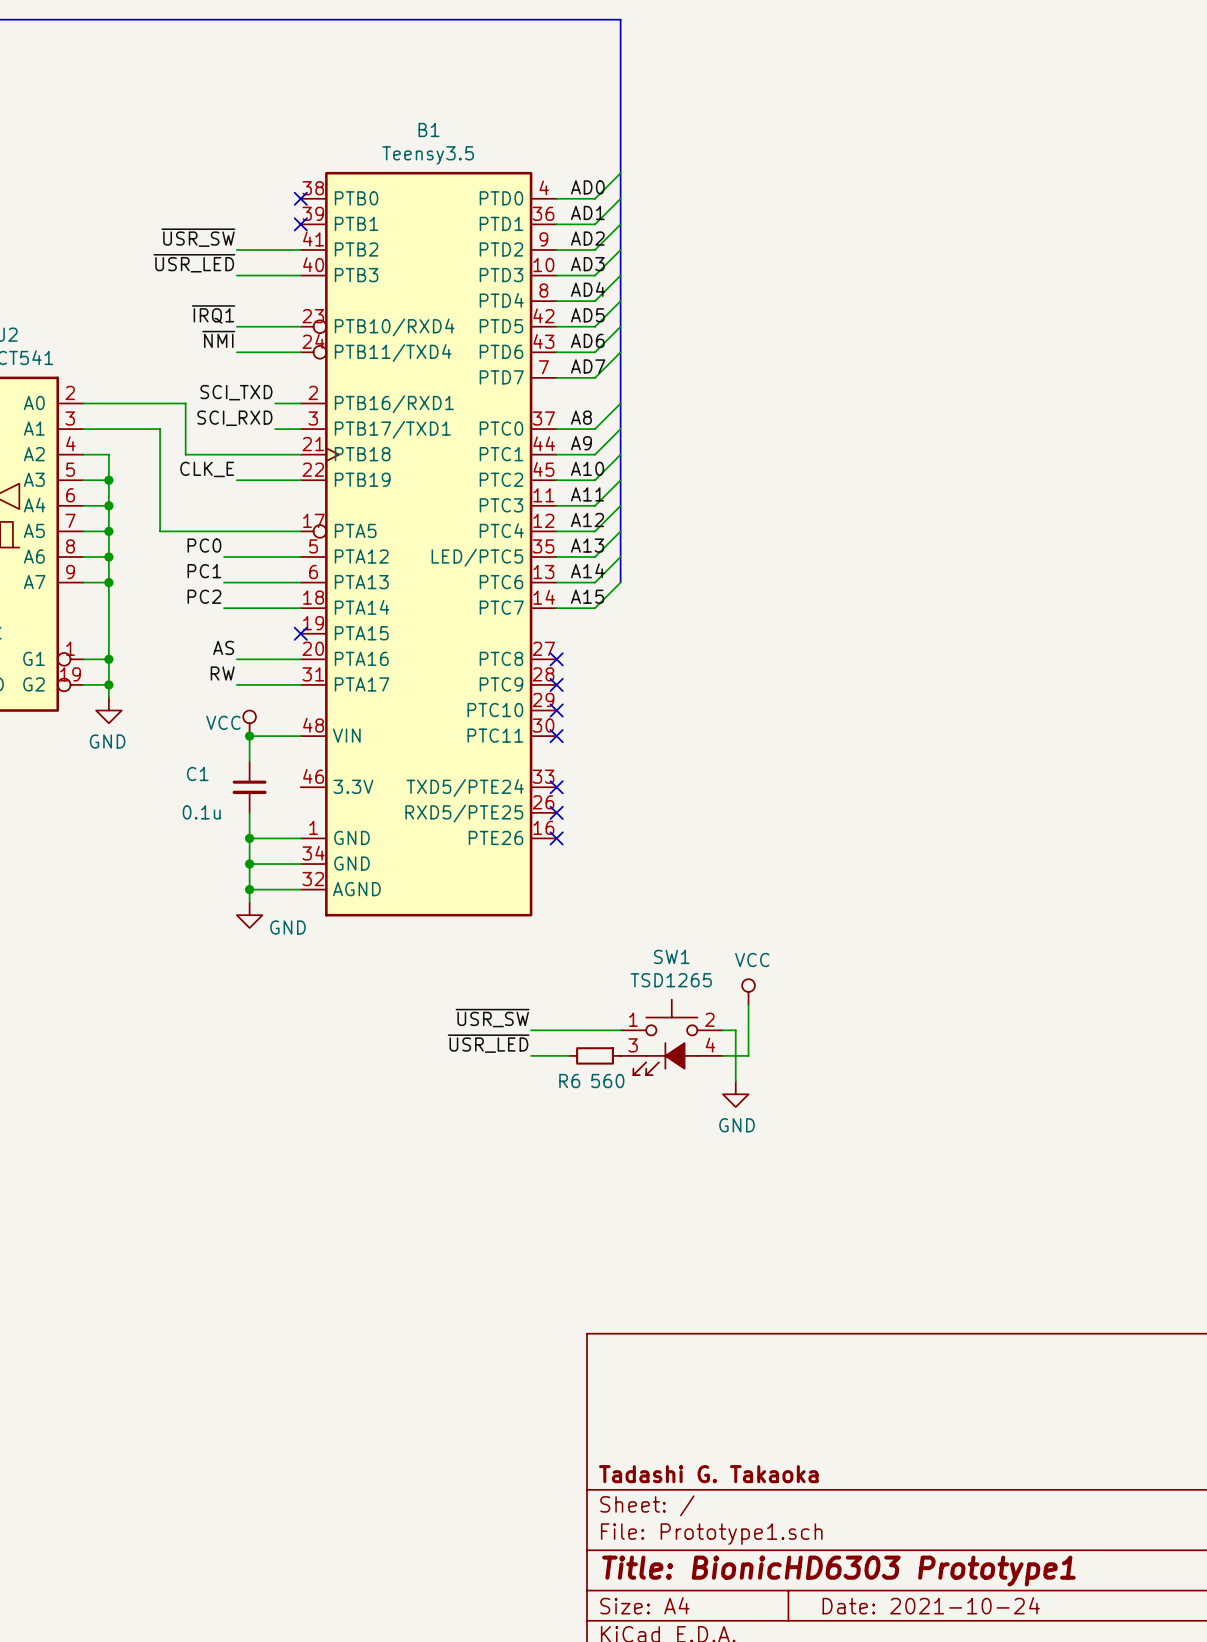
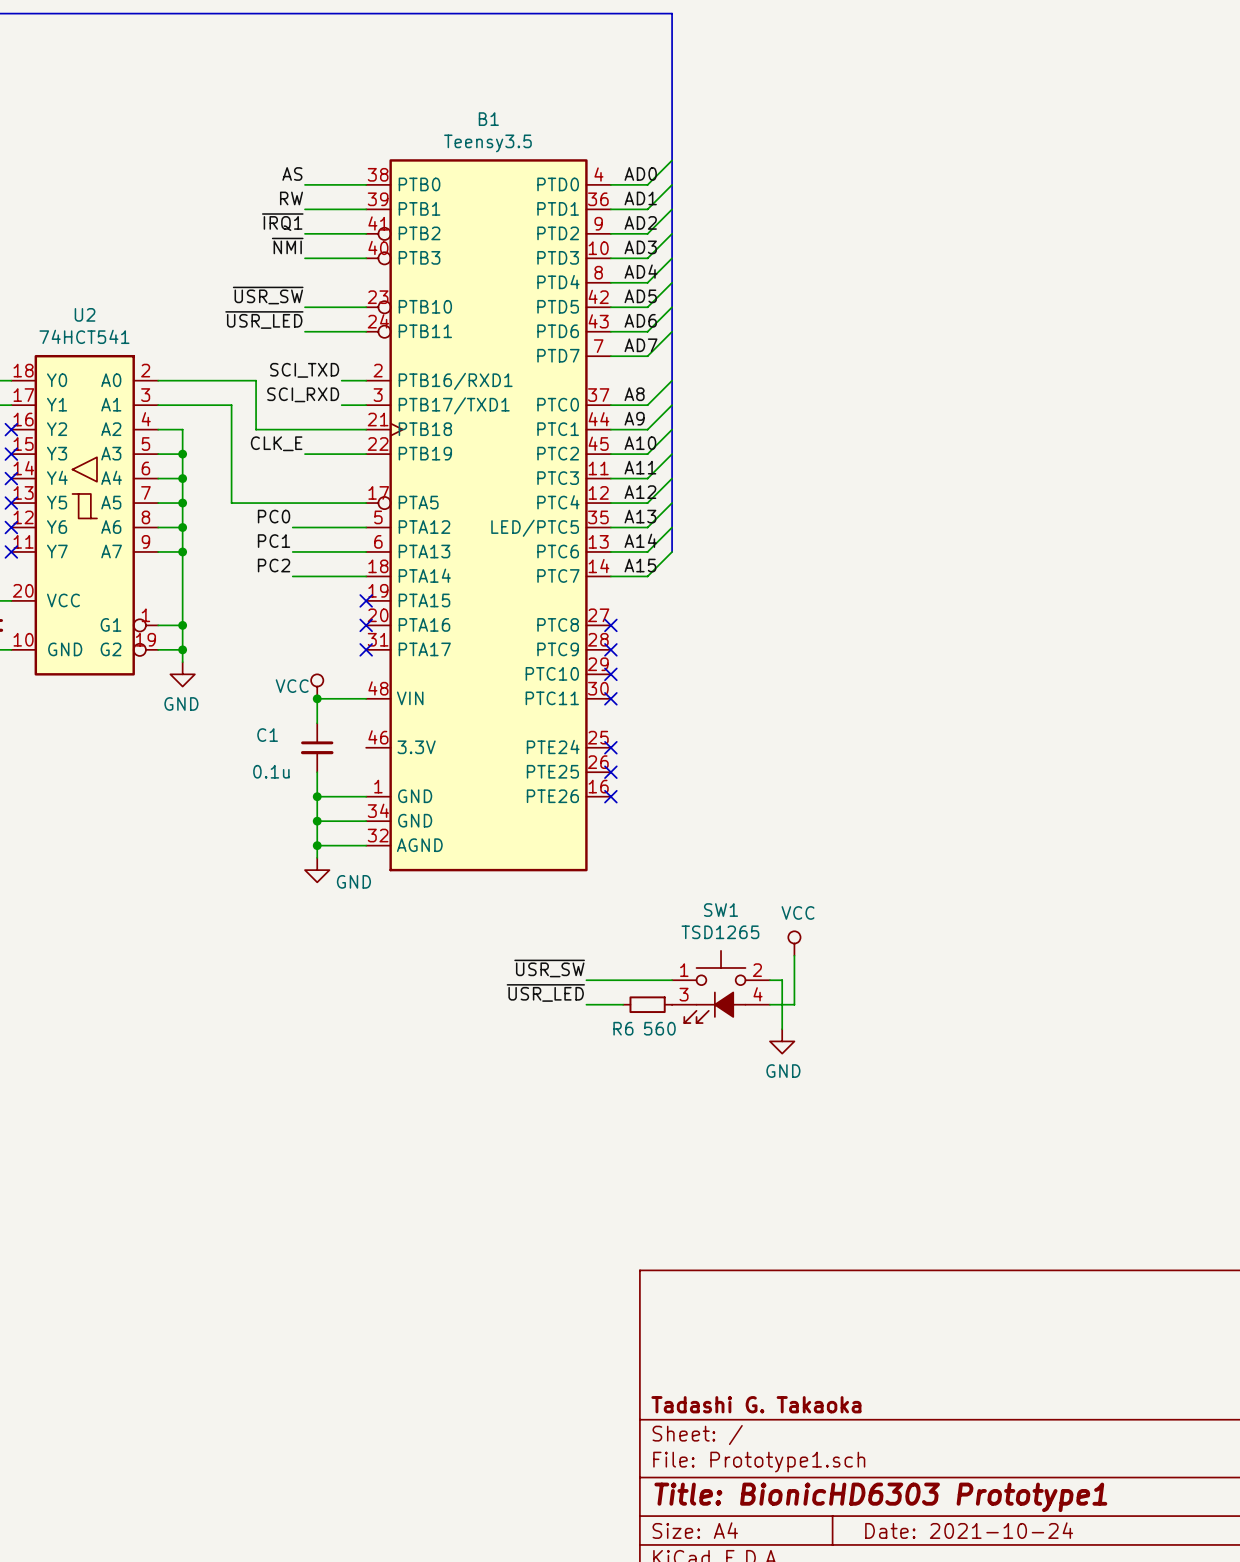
B1 symbol: [300, 171, 557, 917] -> [366, 159, 611, 872]
label: none -> AS (292, 173)
wire: none -> (305, 184) (366, 184)
no-connect mark: (300, 198) -> none
label: none -> RW (291, 198)
wire: none -> (305, 209) (366, 209)
no-connect mark: (300, 224) -> none
label: ~{USR_SW} (198, 237) -> ~{IRQ1} (282, 222)
label: ~{USR_LED} (194, 263) -> ~{NMI} (287, 245)
label: ~{IRQ1} (213, 314) -> ~{USR_SW} (268, 295)
label: ~{NMI} (218, 339) -> ~{USR_LED} (264, 319)
label: AS (223, 647) -> none
wire: (236, 659) (300, 659) -> none
no-connect mark: none -> (366, 625)
label: RW (222, 673) -> none
wire: (236, 684) (300, 684) -> none
no-connect mark: none -> (366, 649)

